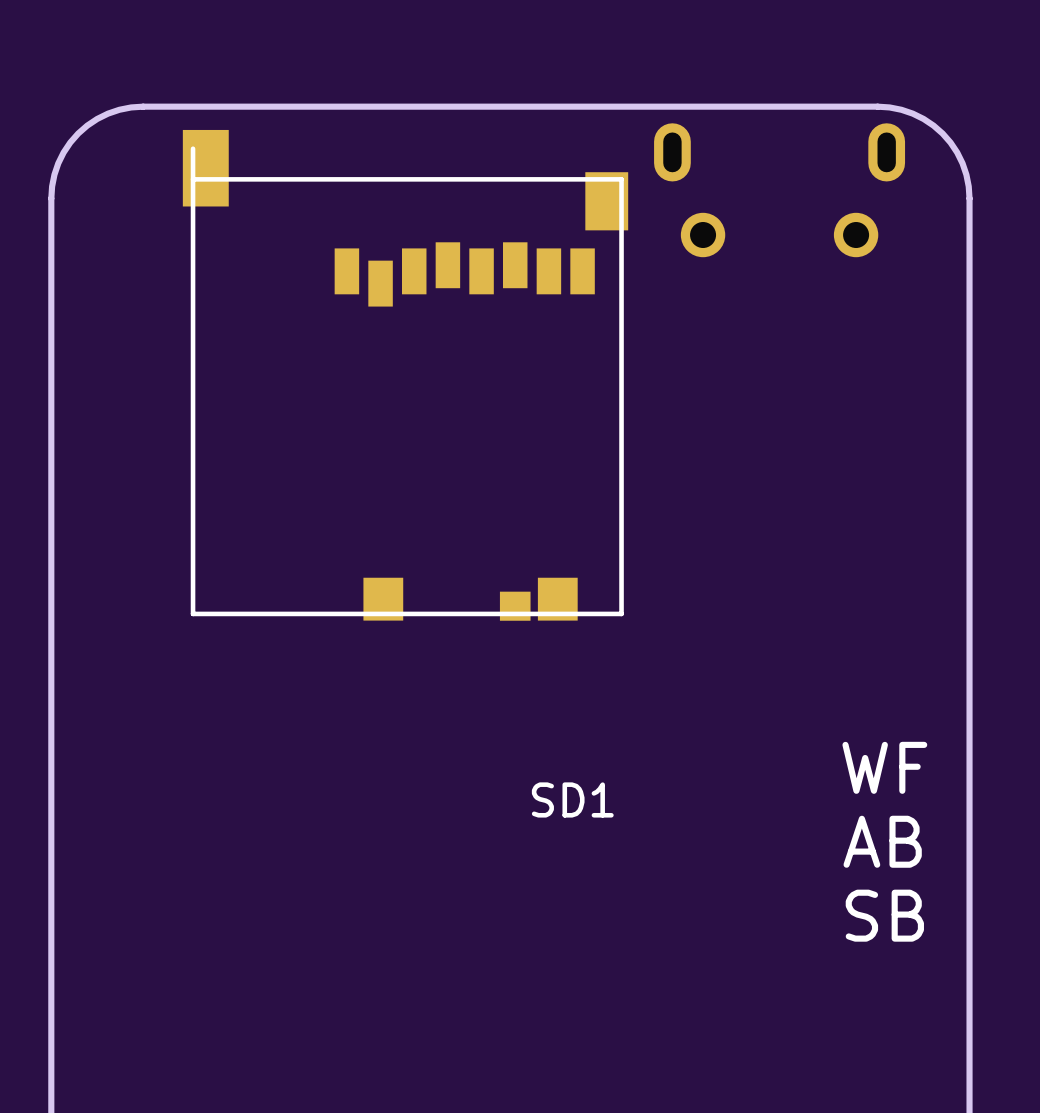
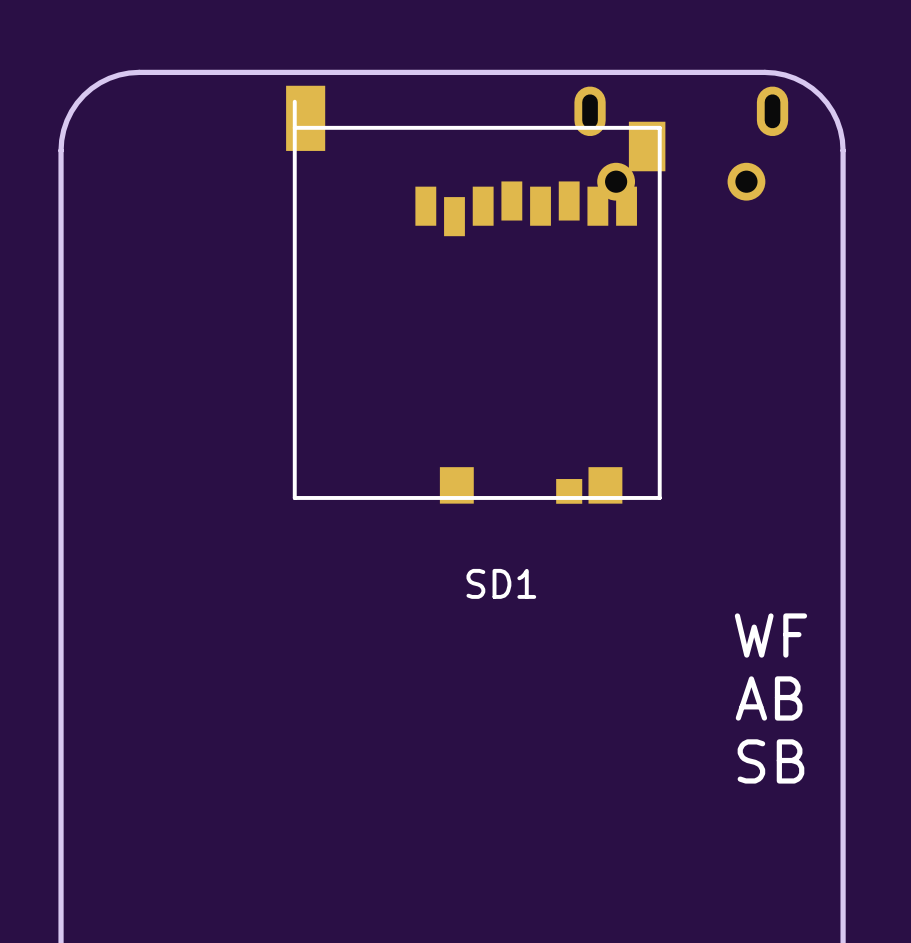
SD1 position: (405, 375) -> (475, 294)
SD1 name position: SD1 (572, 799) -> SD1 (501, 583)

